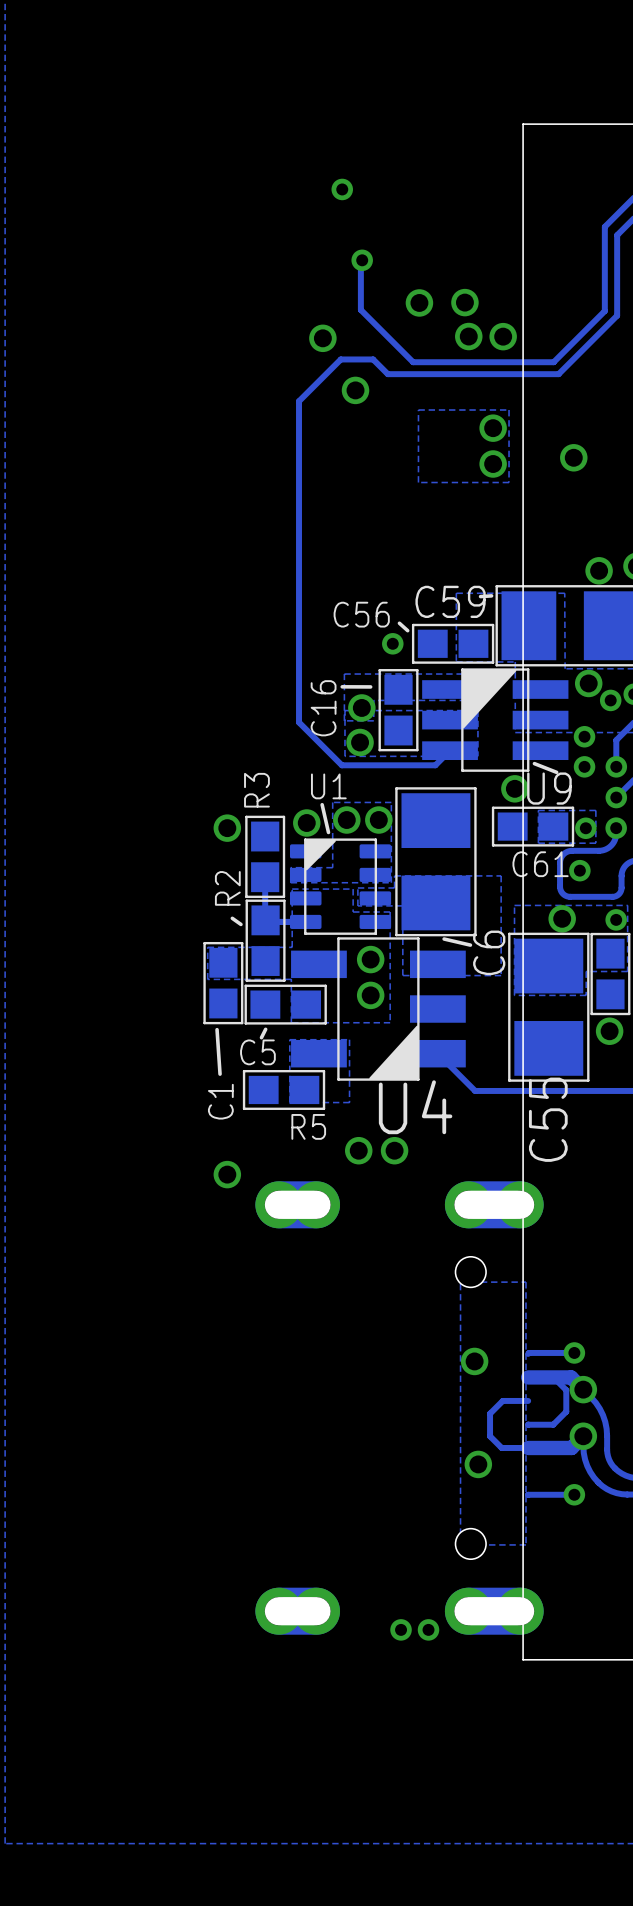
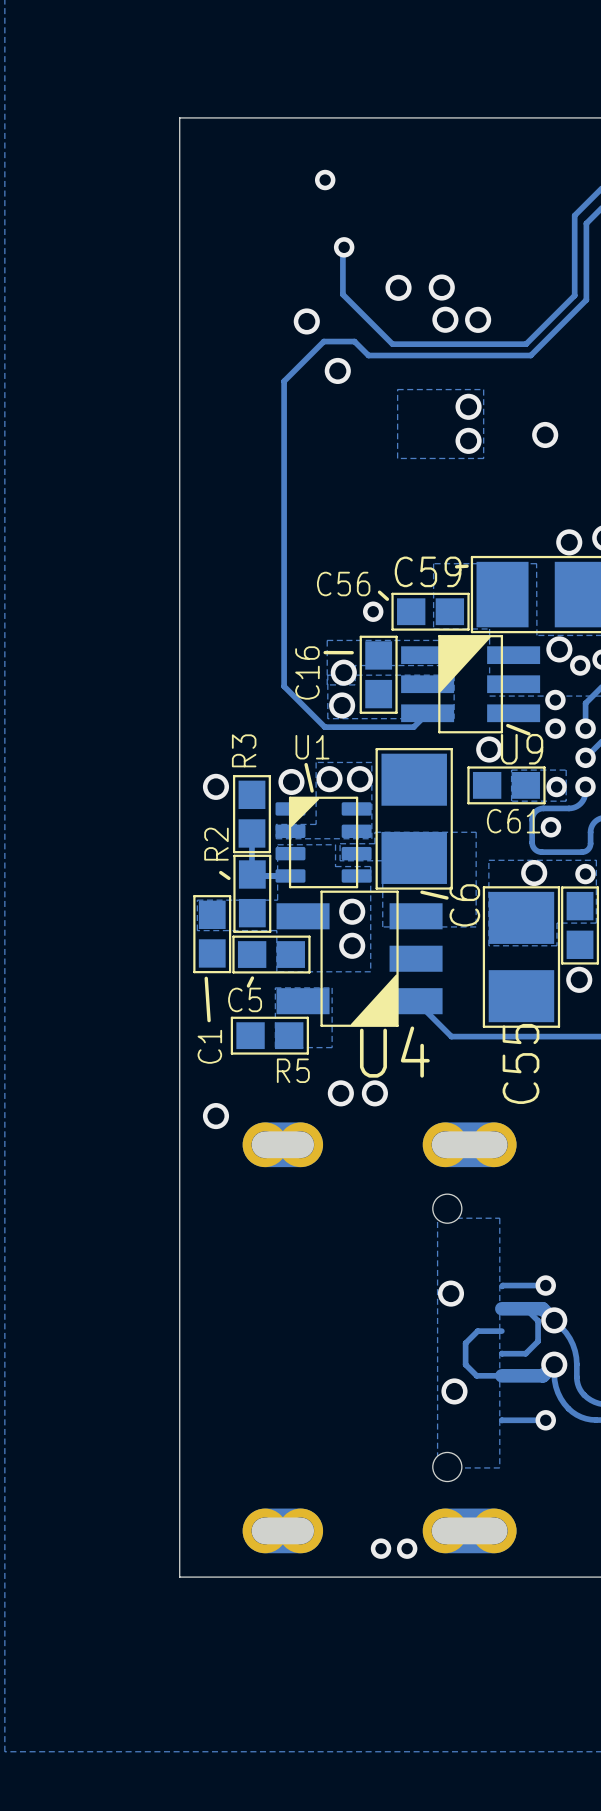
board edge: (523, 124) (523, 1659) -> (497, 117) (179, 117) (179, 1577) (497, 1577)

